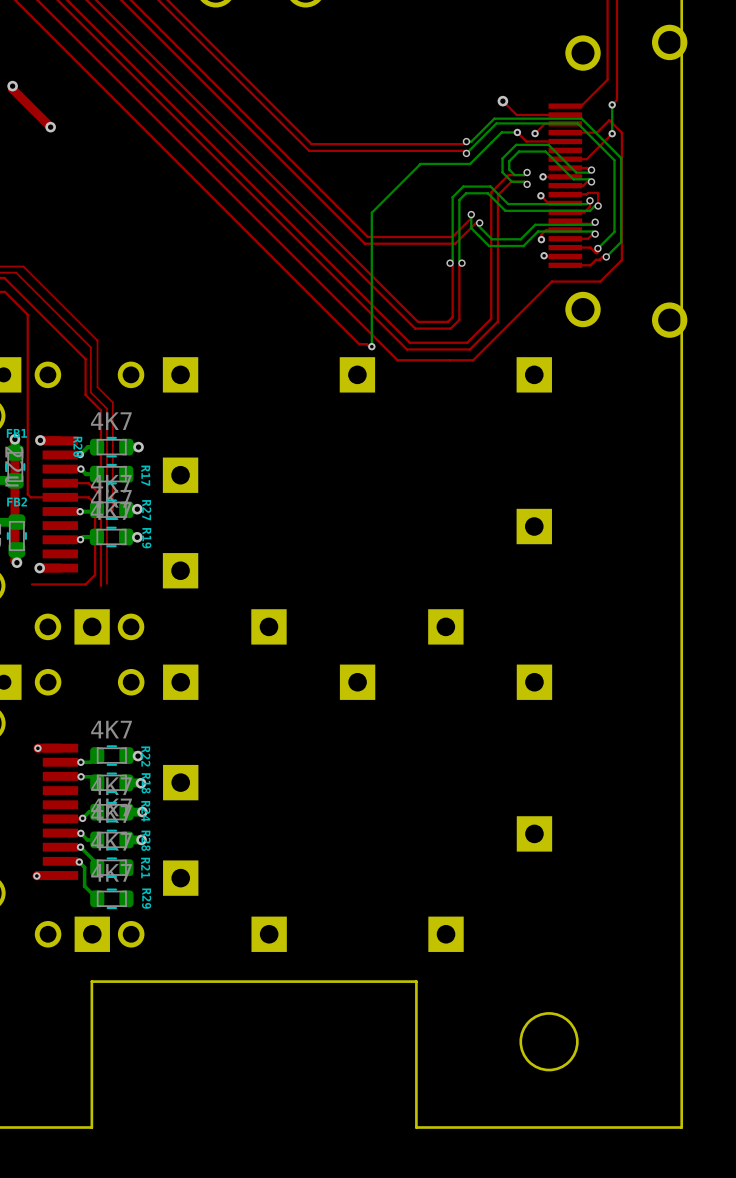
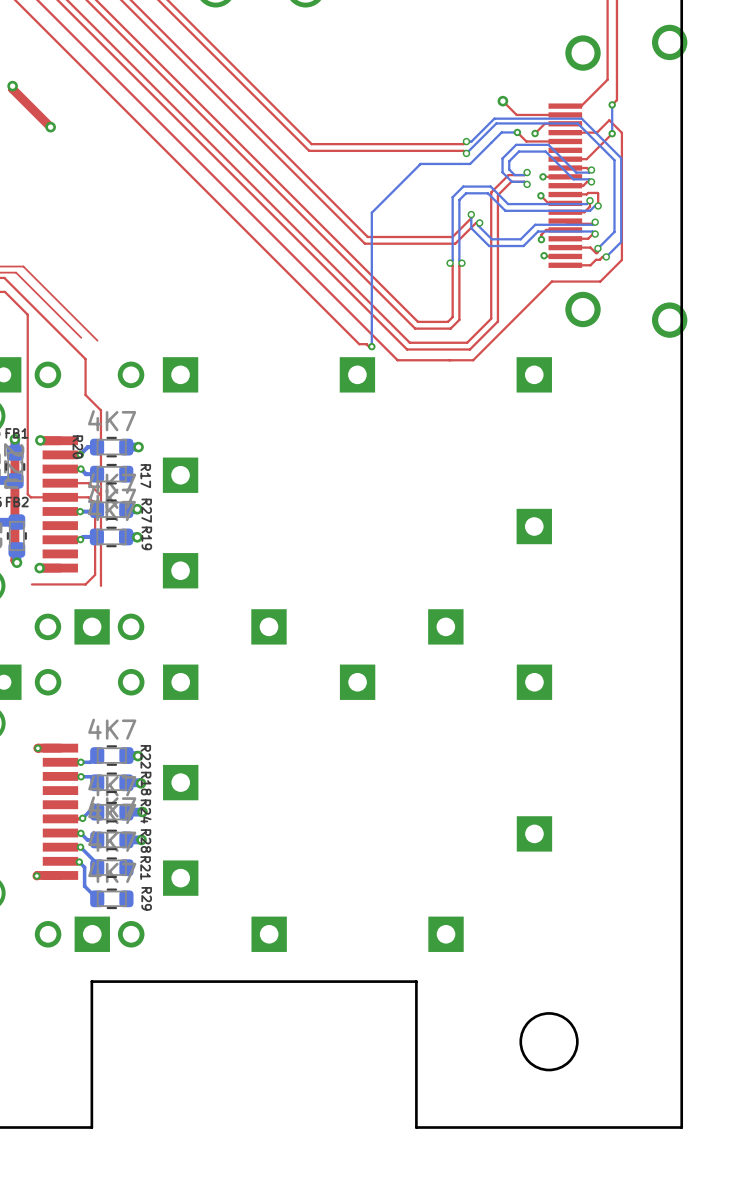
top track: (81, 337) (90, 347) (90, 392) (106, 408) (106, 583) -> none
top track: (97, 340) (97, 387) (112, 402) (112, 510) -> none

